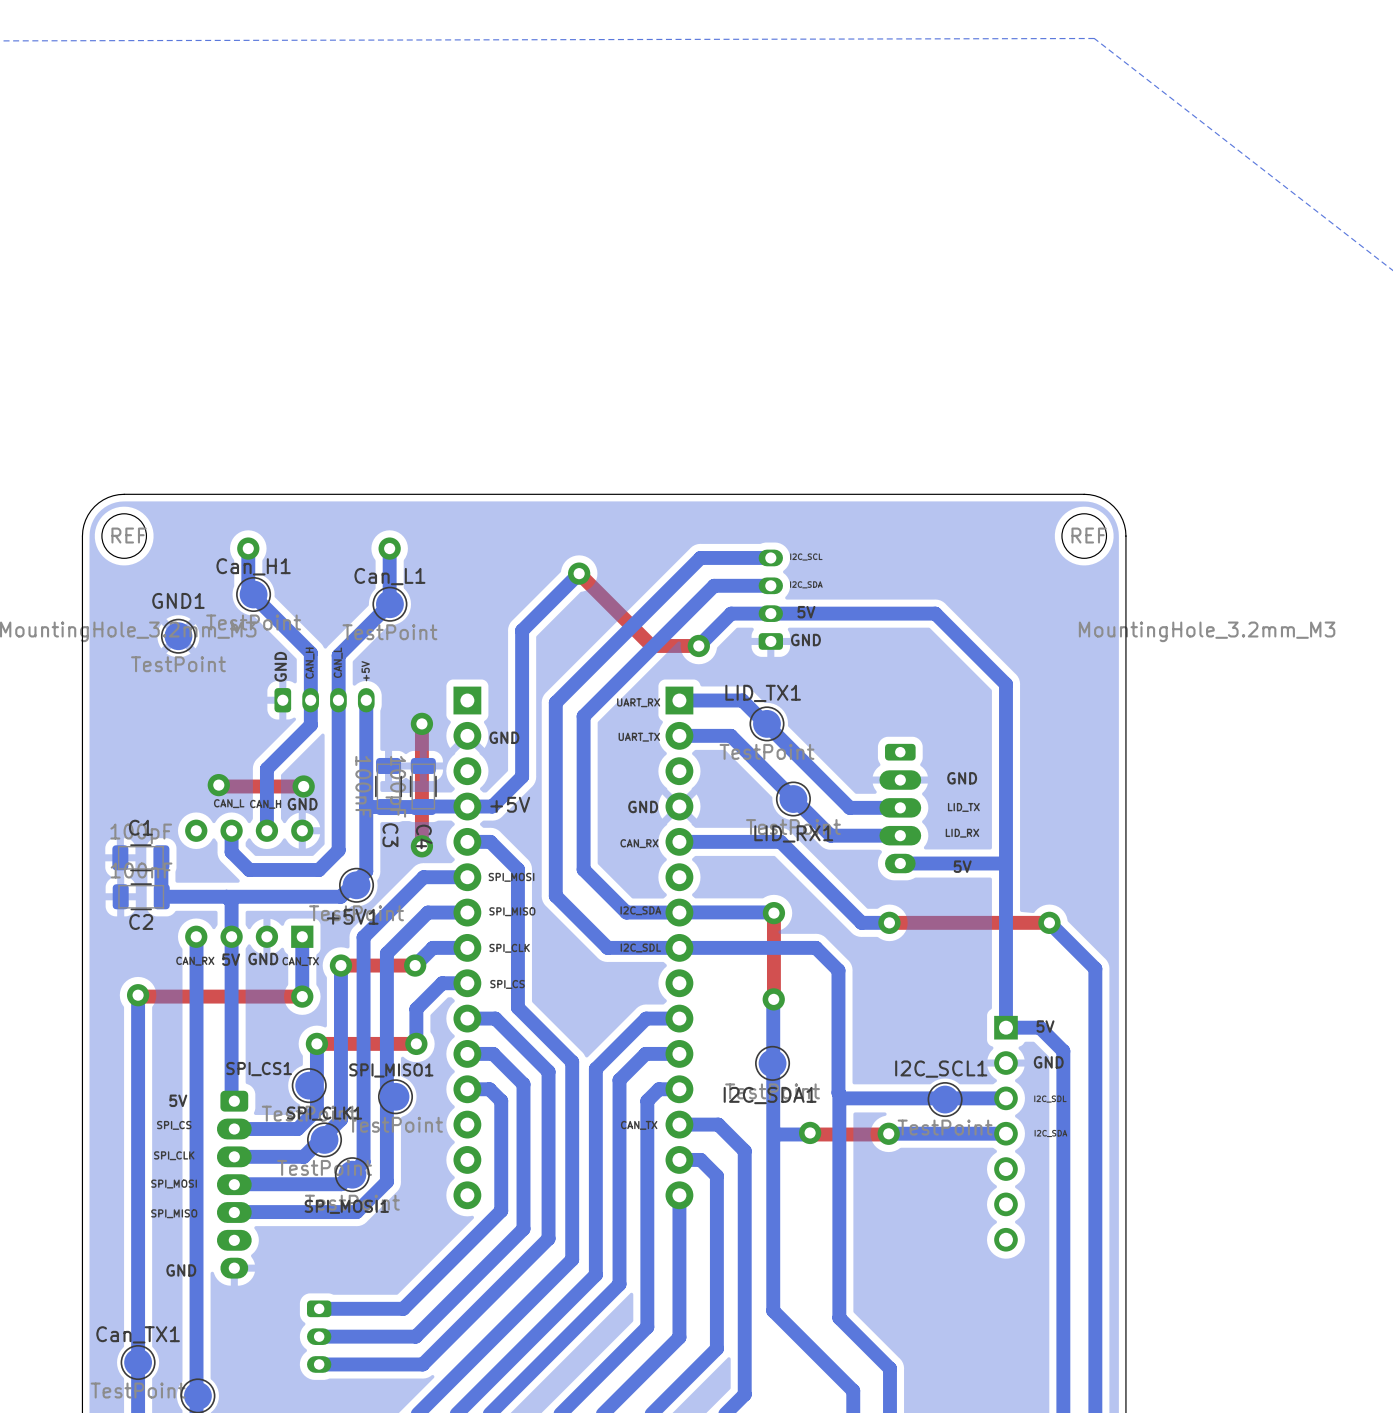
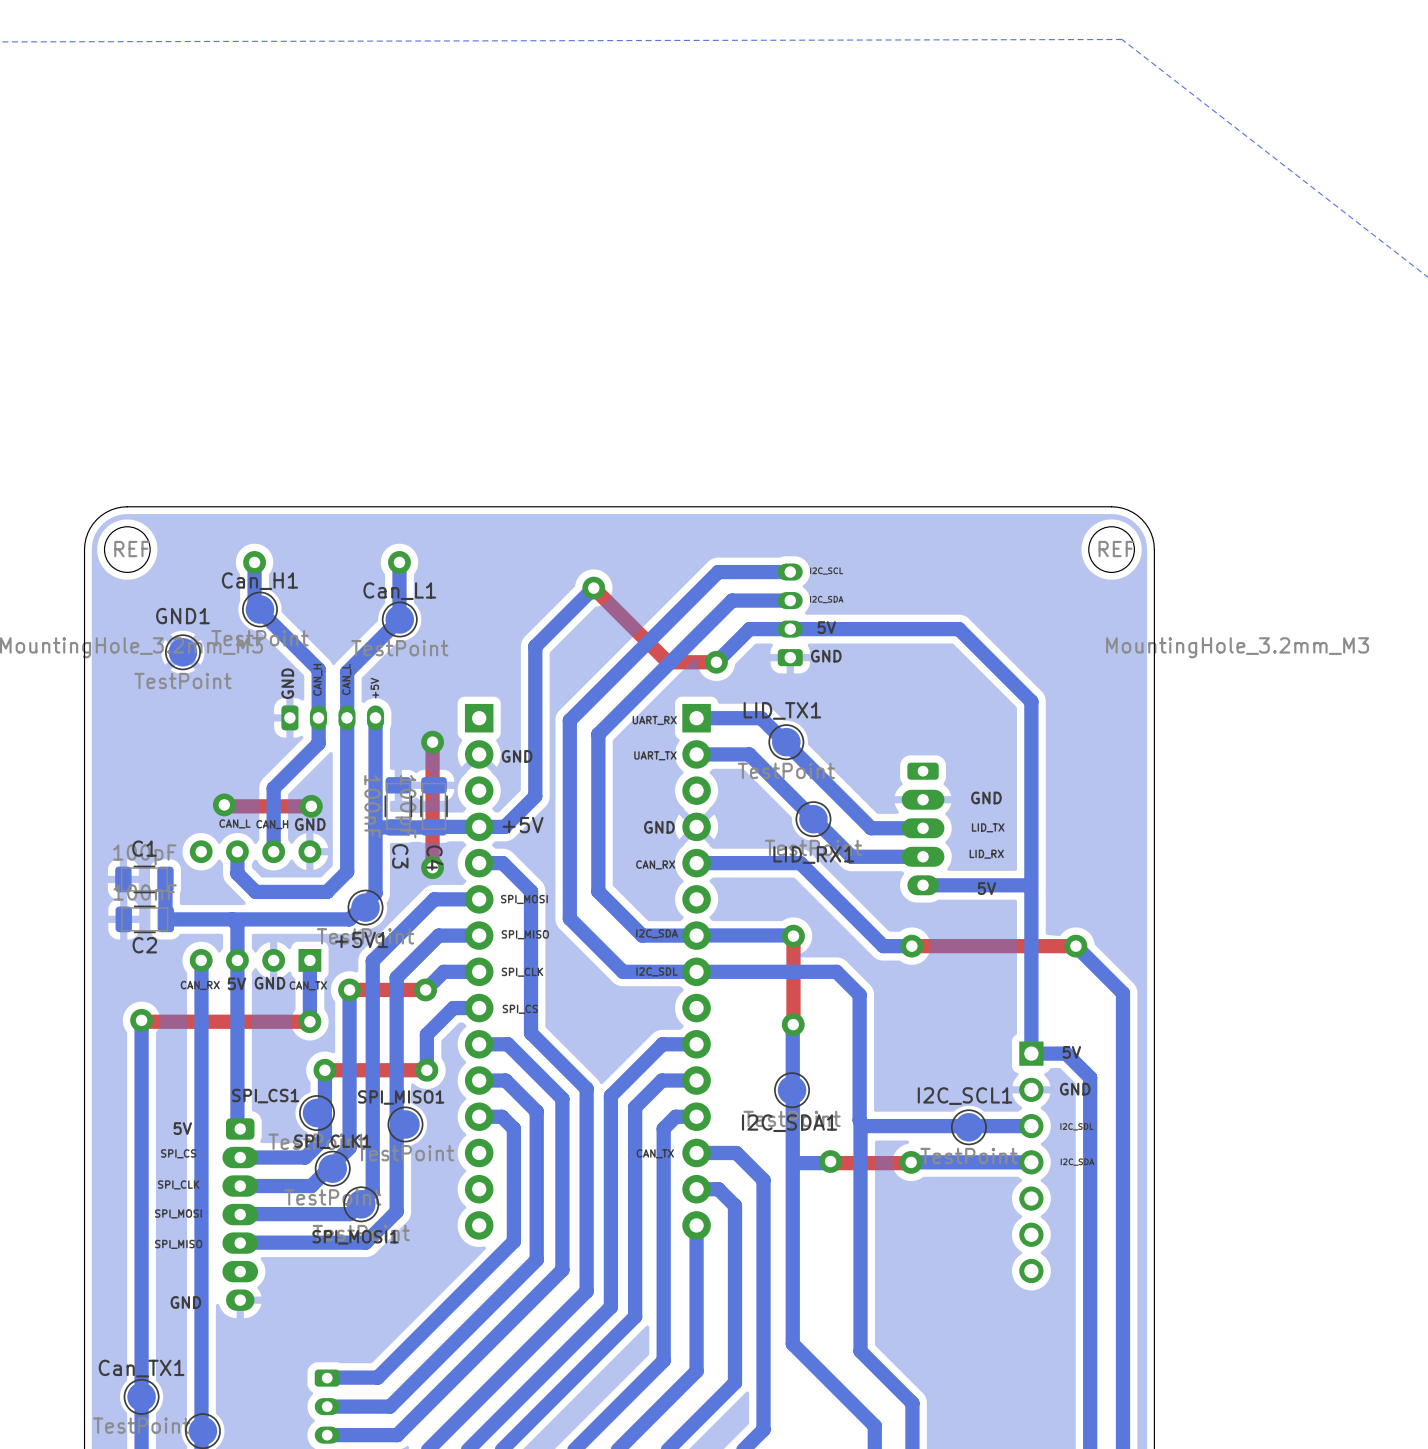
bottom track: (403, 1308) (319, 1308) -> (413, 1341) (377, 1377) (327, 1378)
part position: (319, 1336) -> (327, 1406)
bottom track: (415, 1336) (319, 1336) -> (426, 1370) (390, 1406) (327, 1406)
bottom track: (422, 1364) (319, 1364) -> (433, 1398) (397, 1435) (327, 1435)

